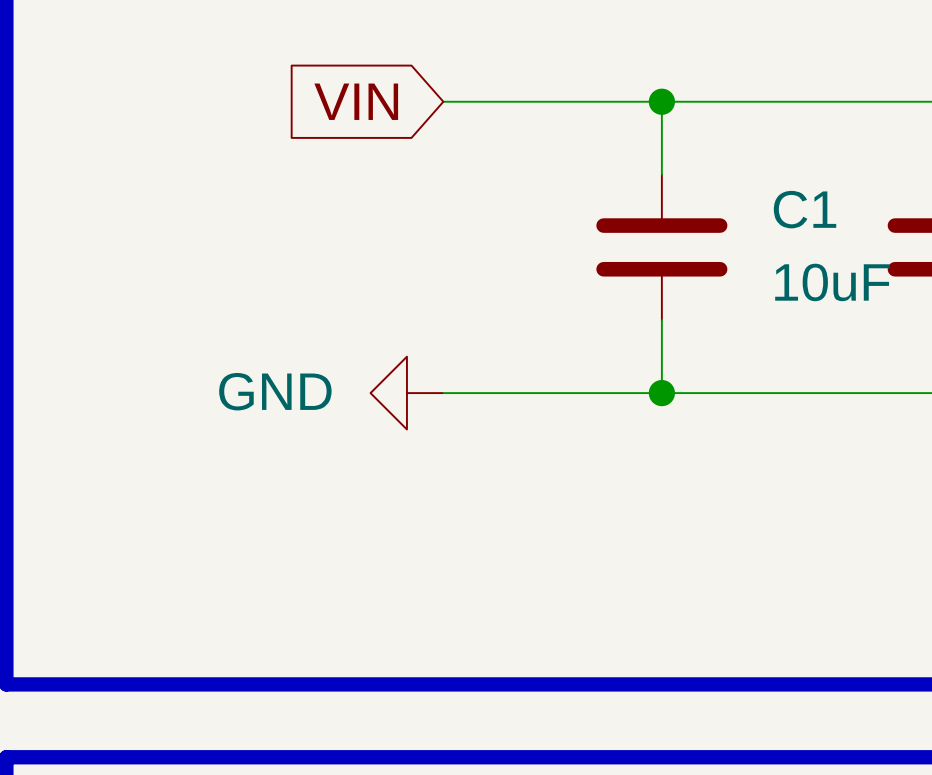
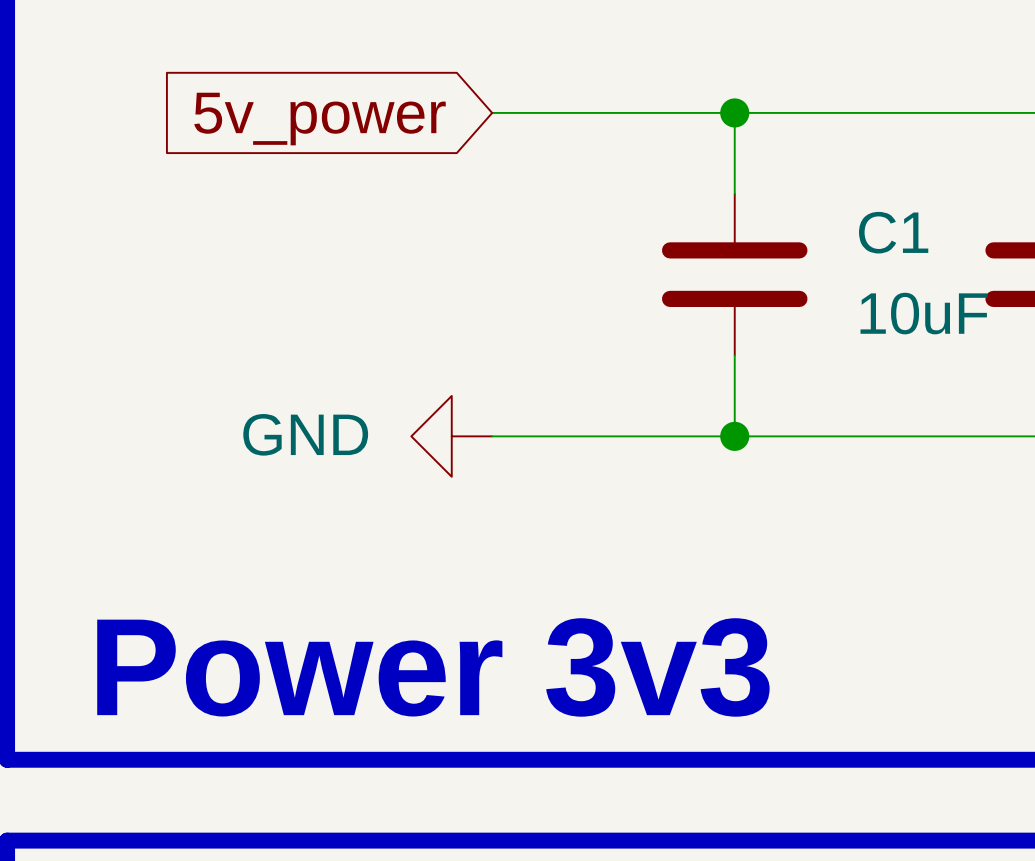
global label: VIN (356, 101) -> 5v_power (320, 119)
text: none -> Power 3v3 (433, 667)

